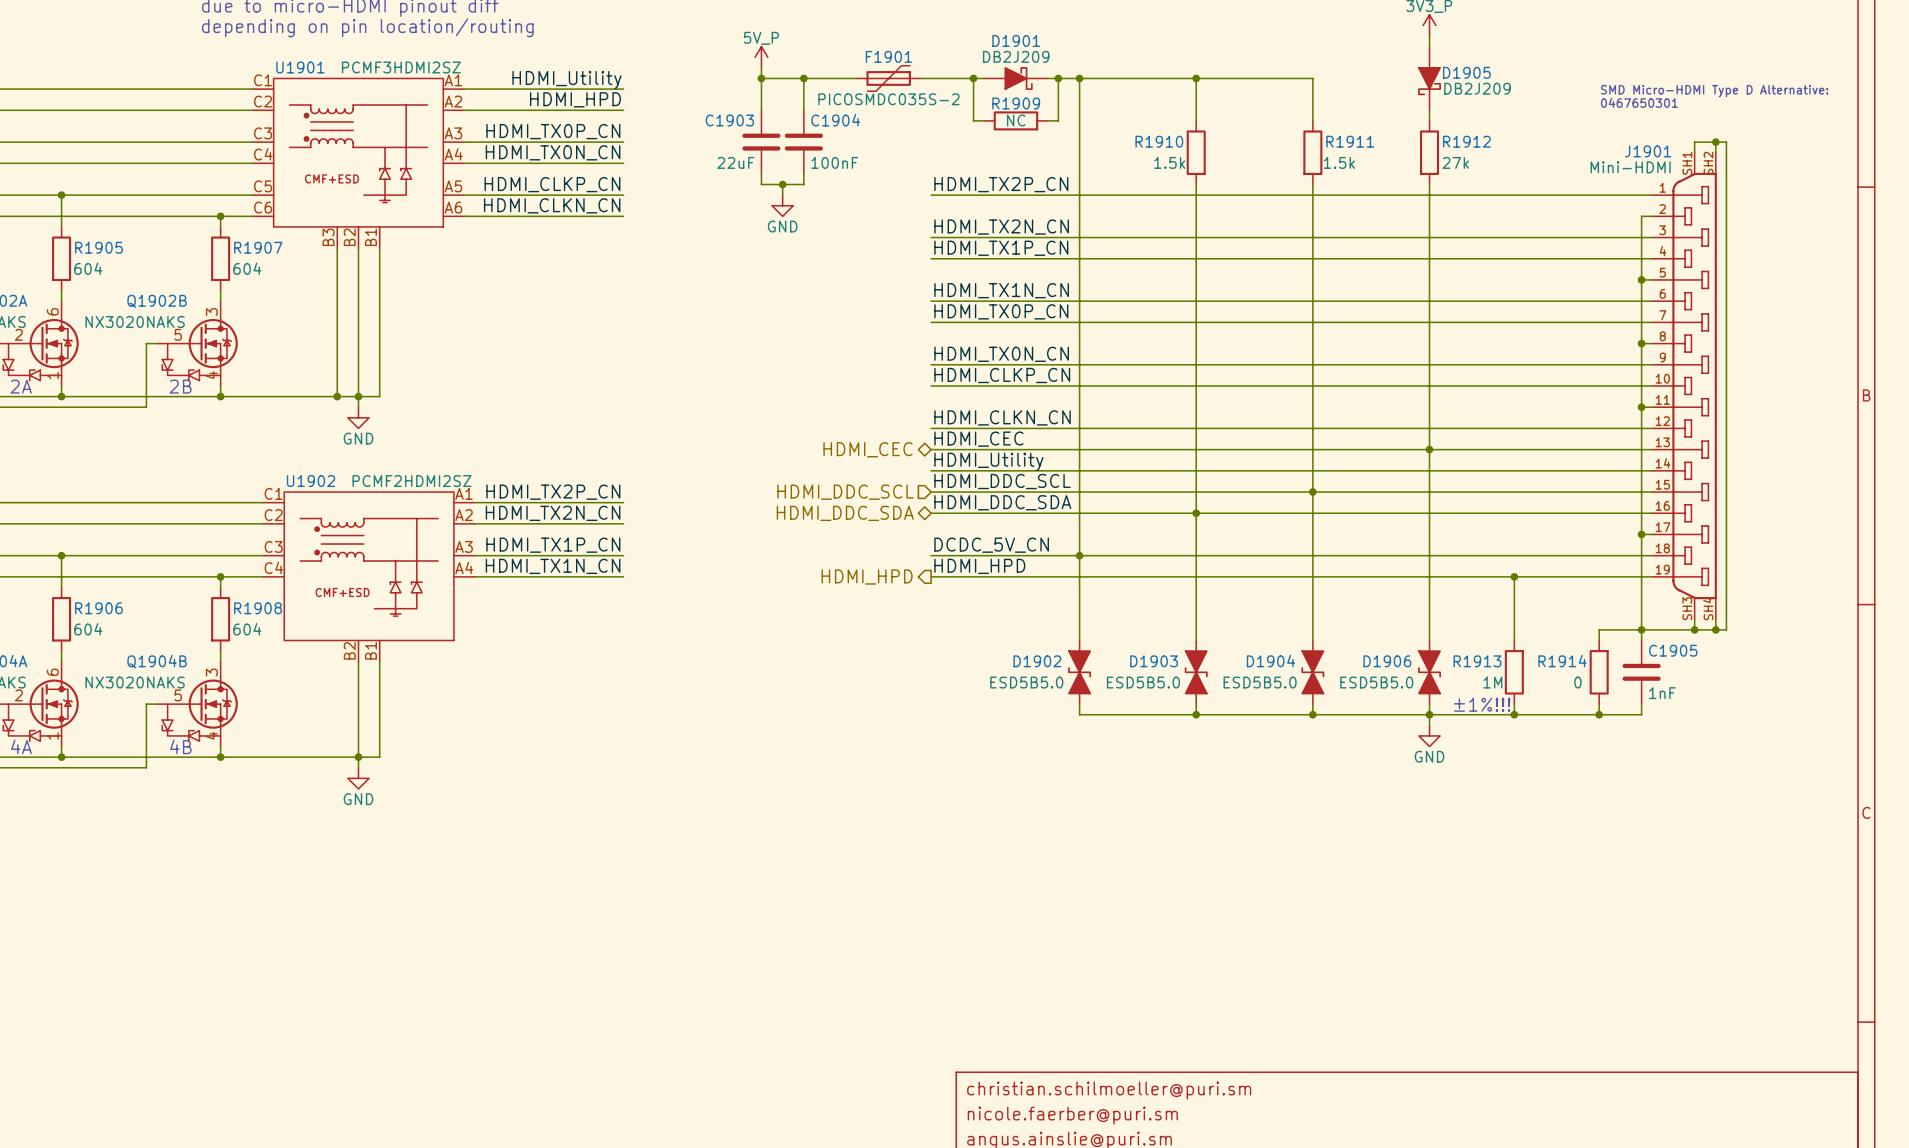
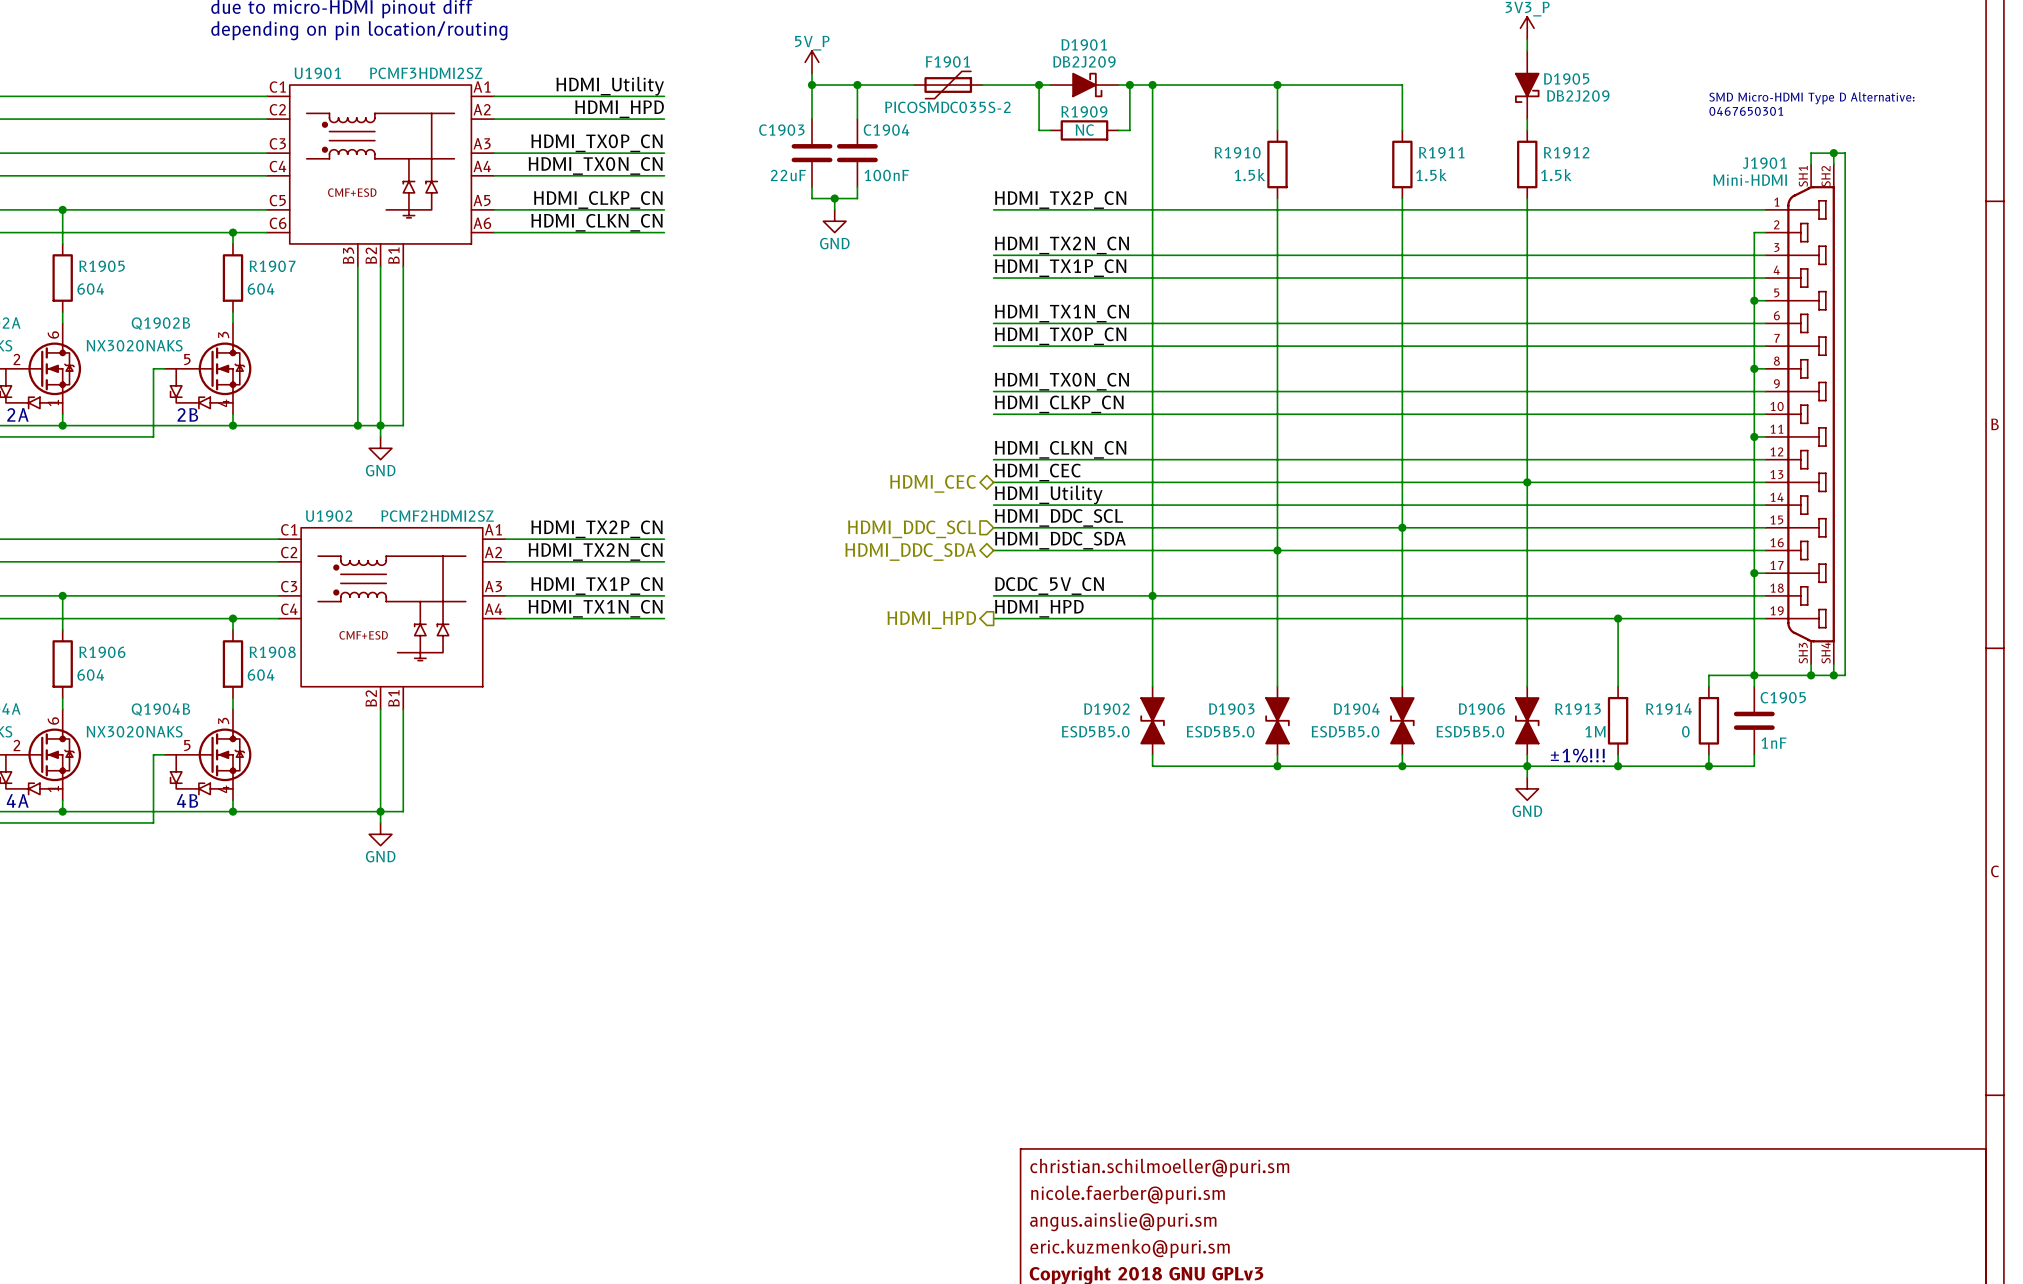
R1912 value: 27k (1455, 162) -> 1.5k (1556, 175)

